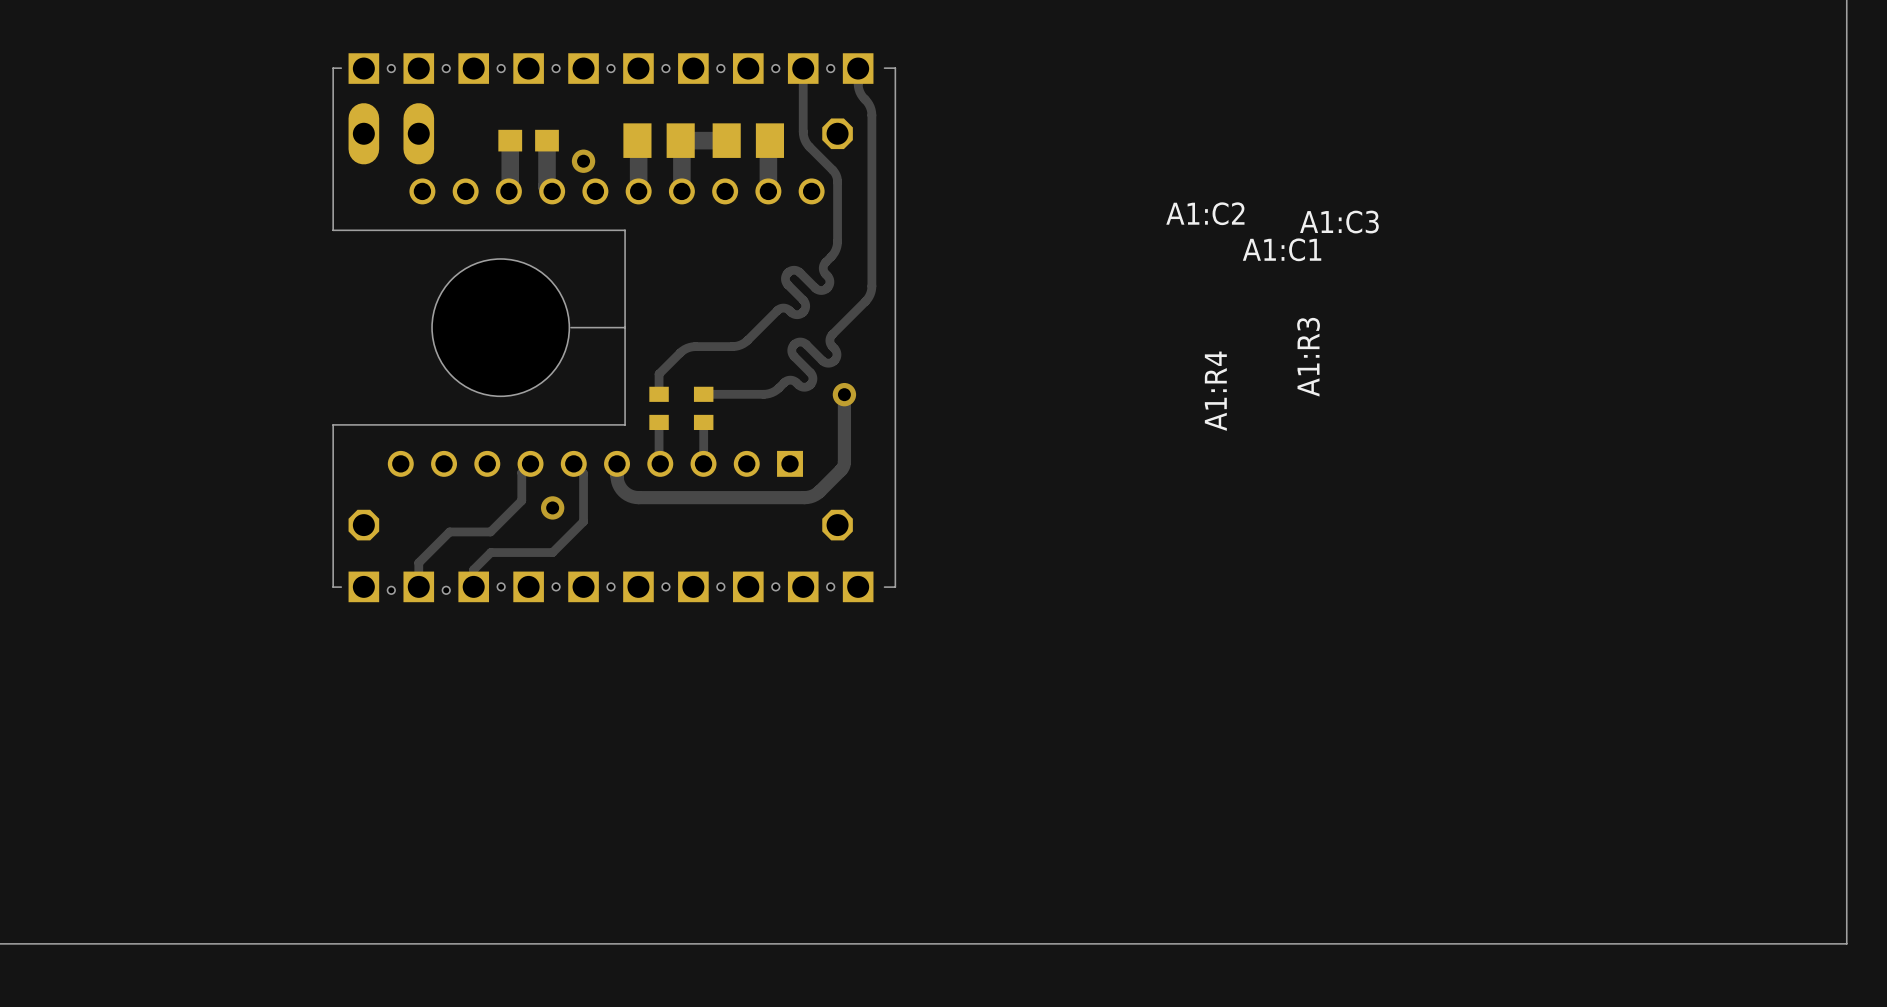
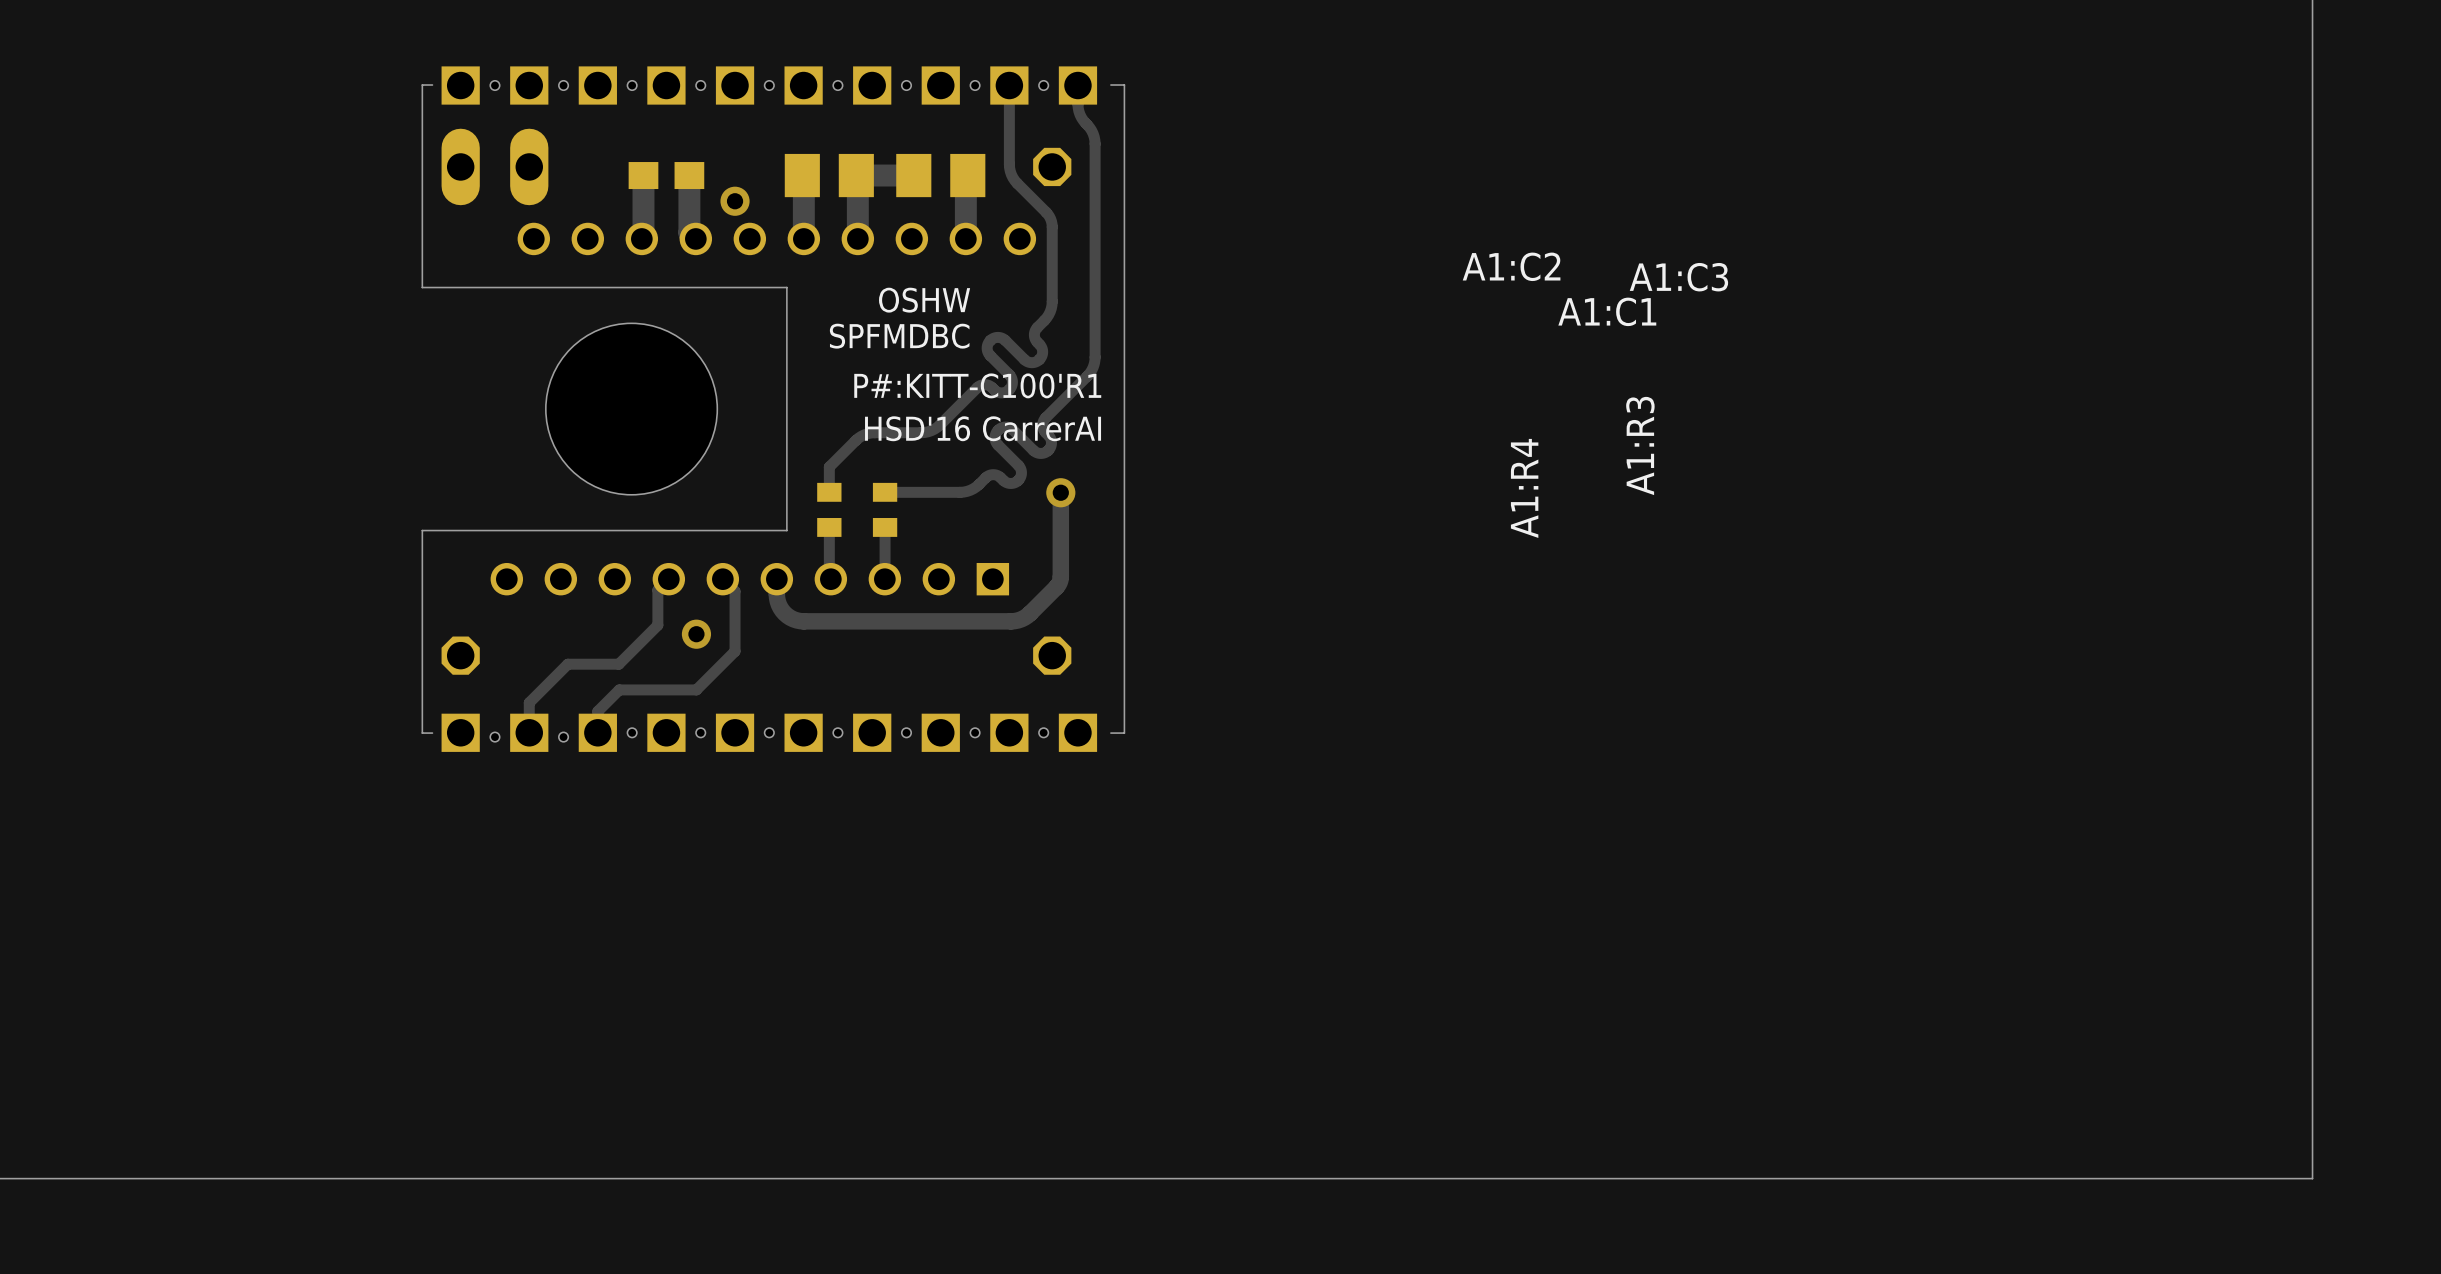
text: none -> OSHW (924, 300)
text: none -> SPFMDBC (899, 336)
text: none -> P#:KITT-C100'R1 (977, 385)
board edge: (625, 327) (571, 327) -> none
text: none -> HSD'16 CarrerAI (983, 428)

